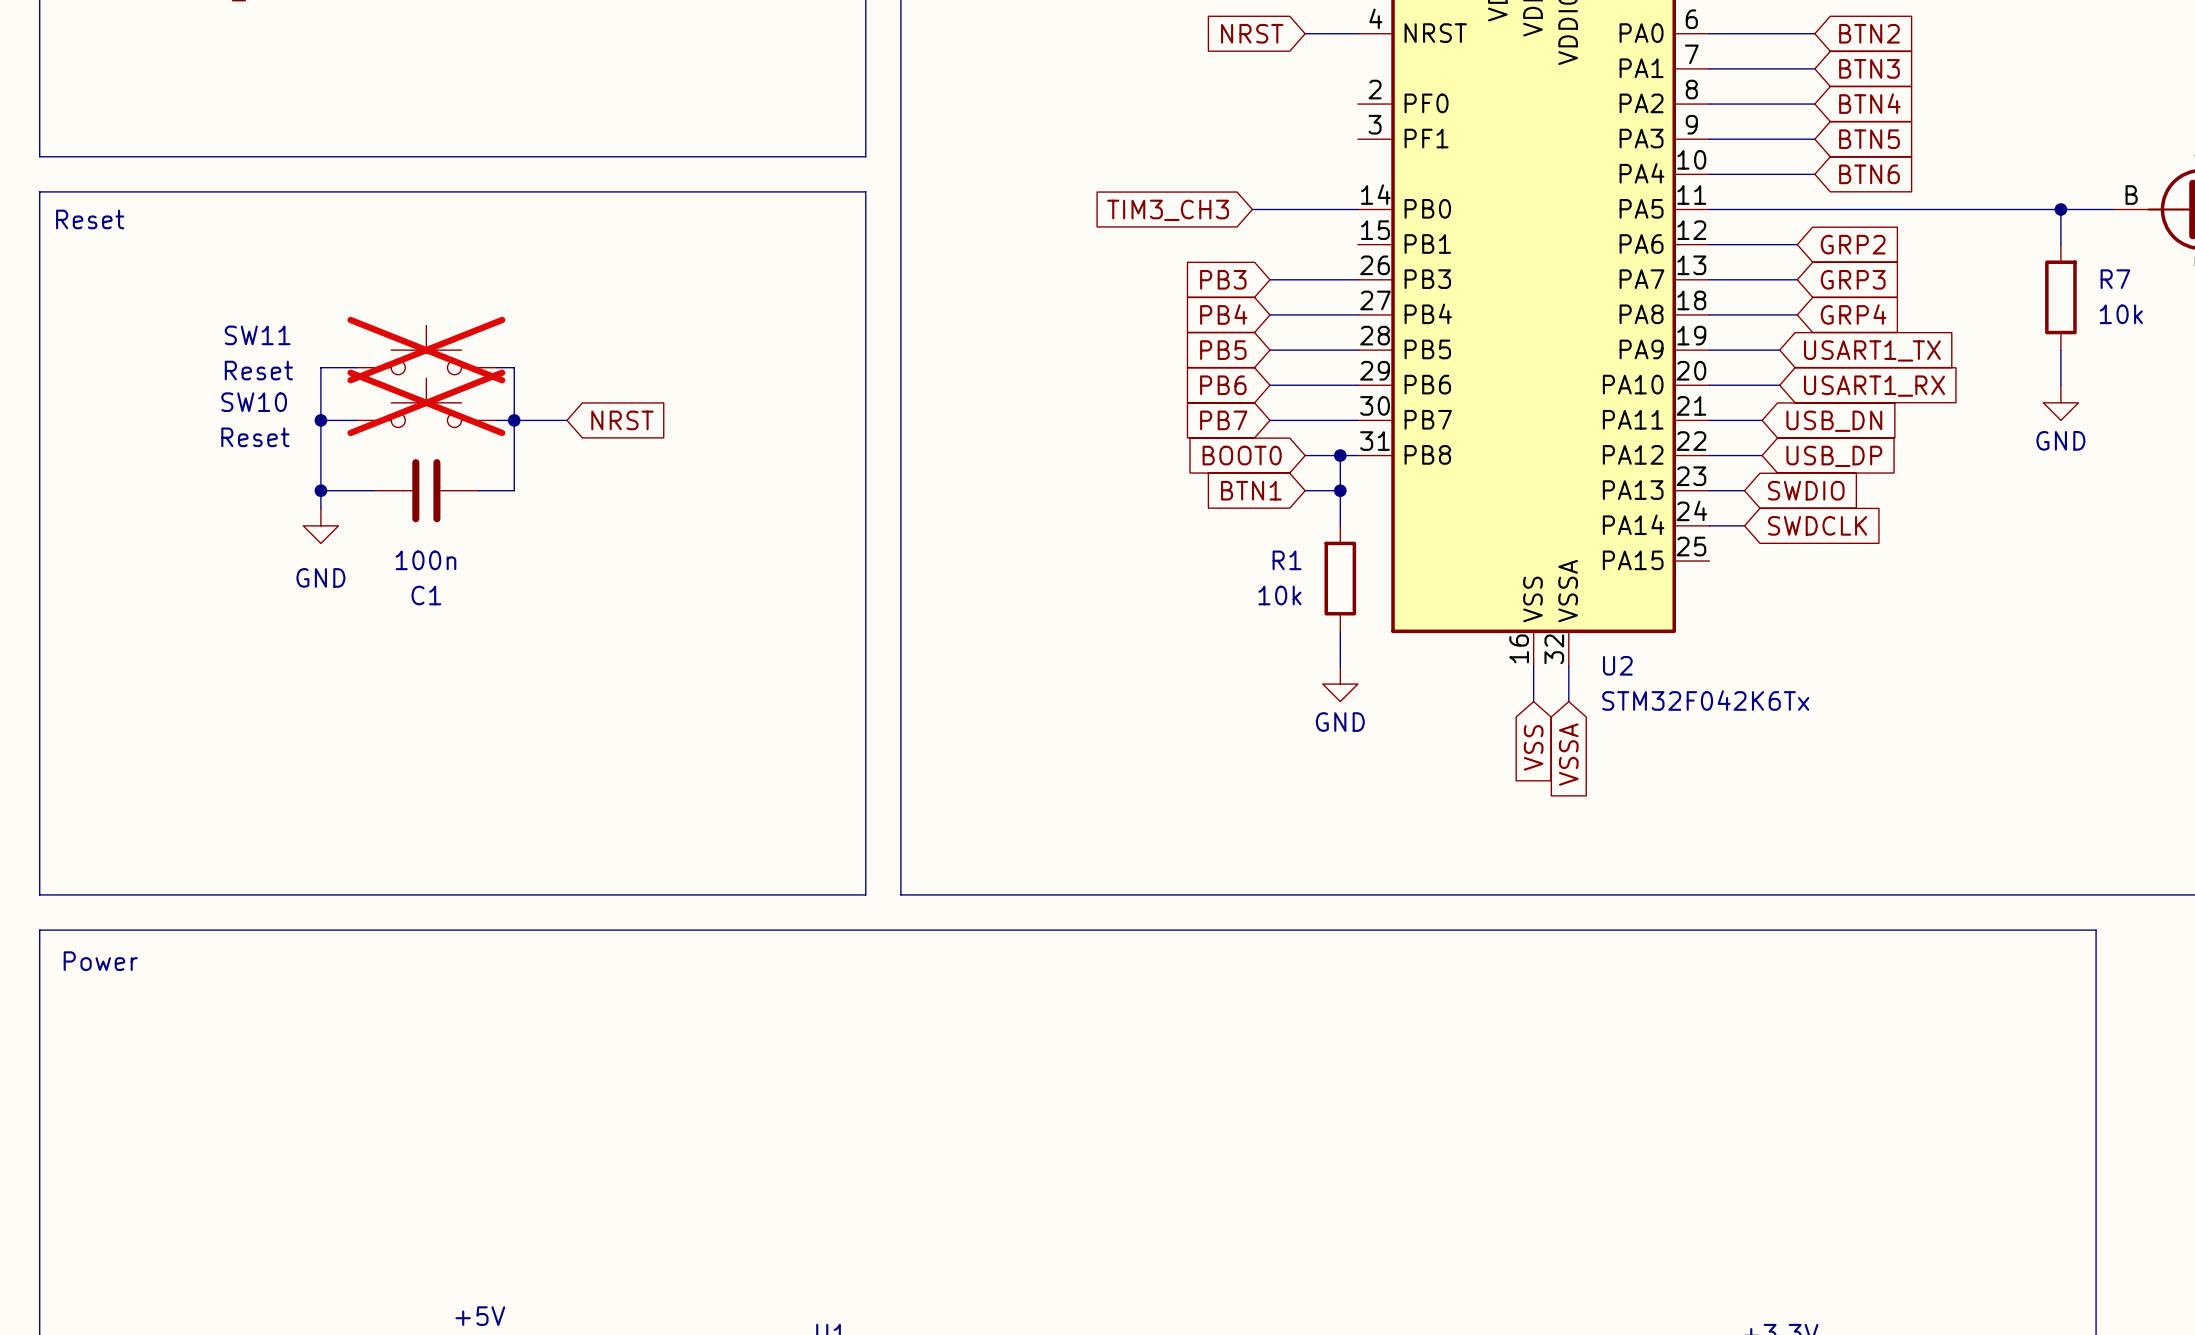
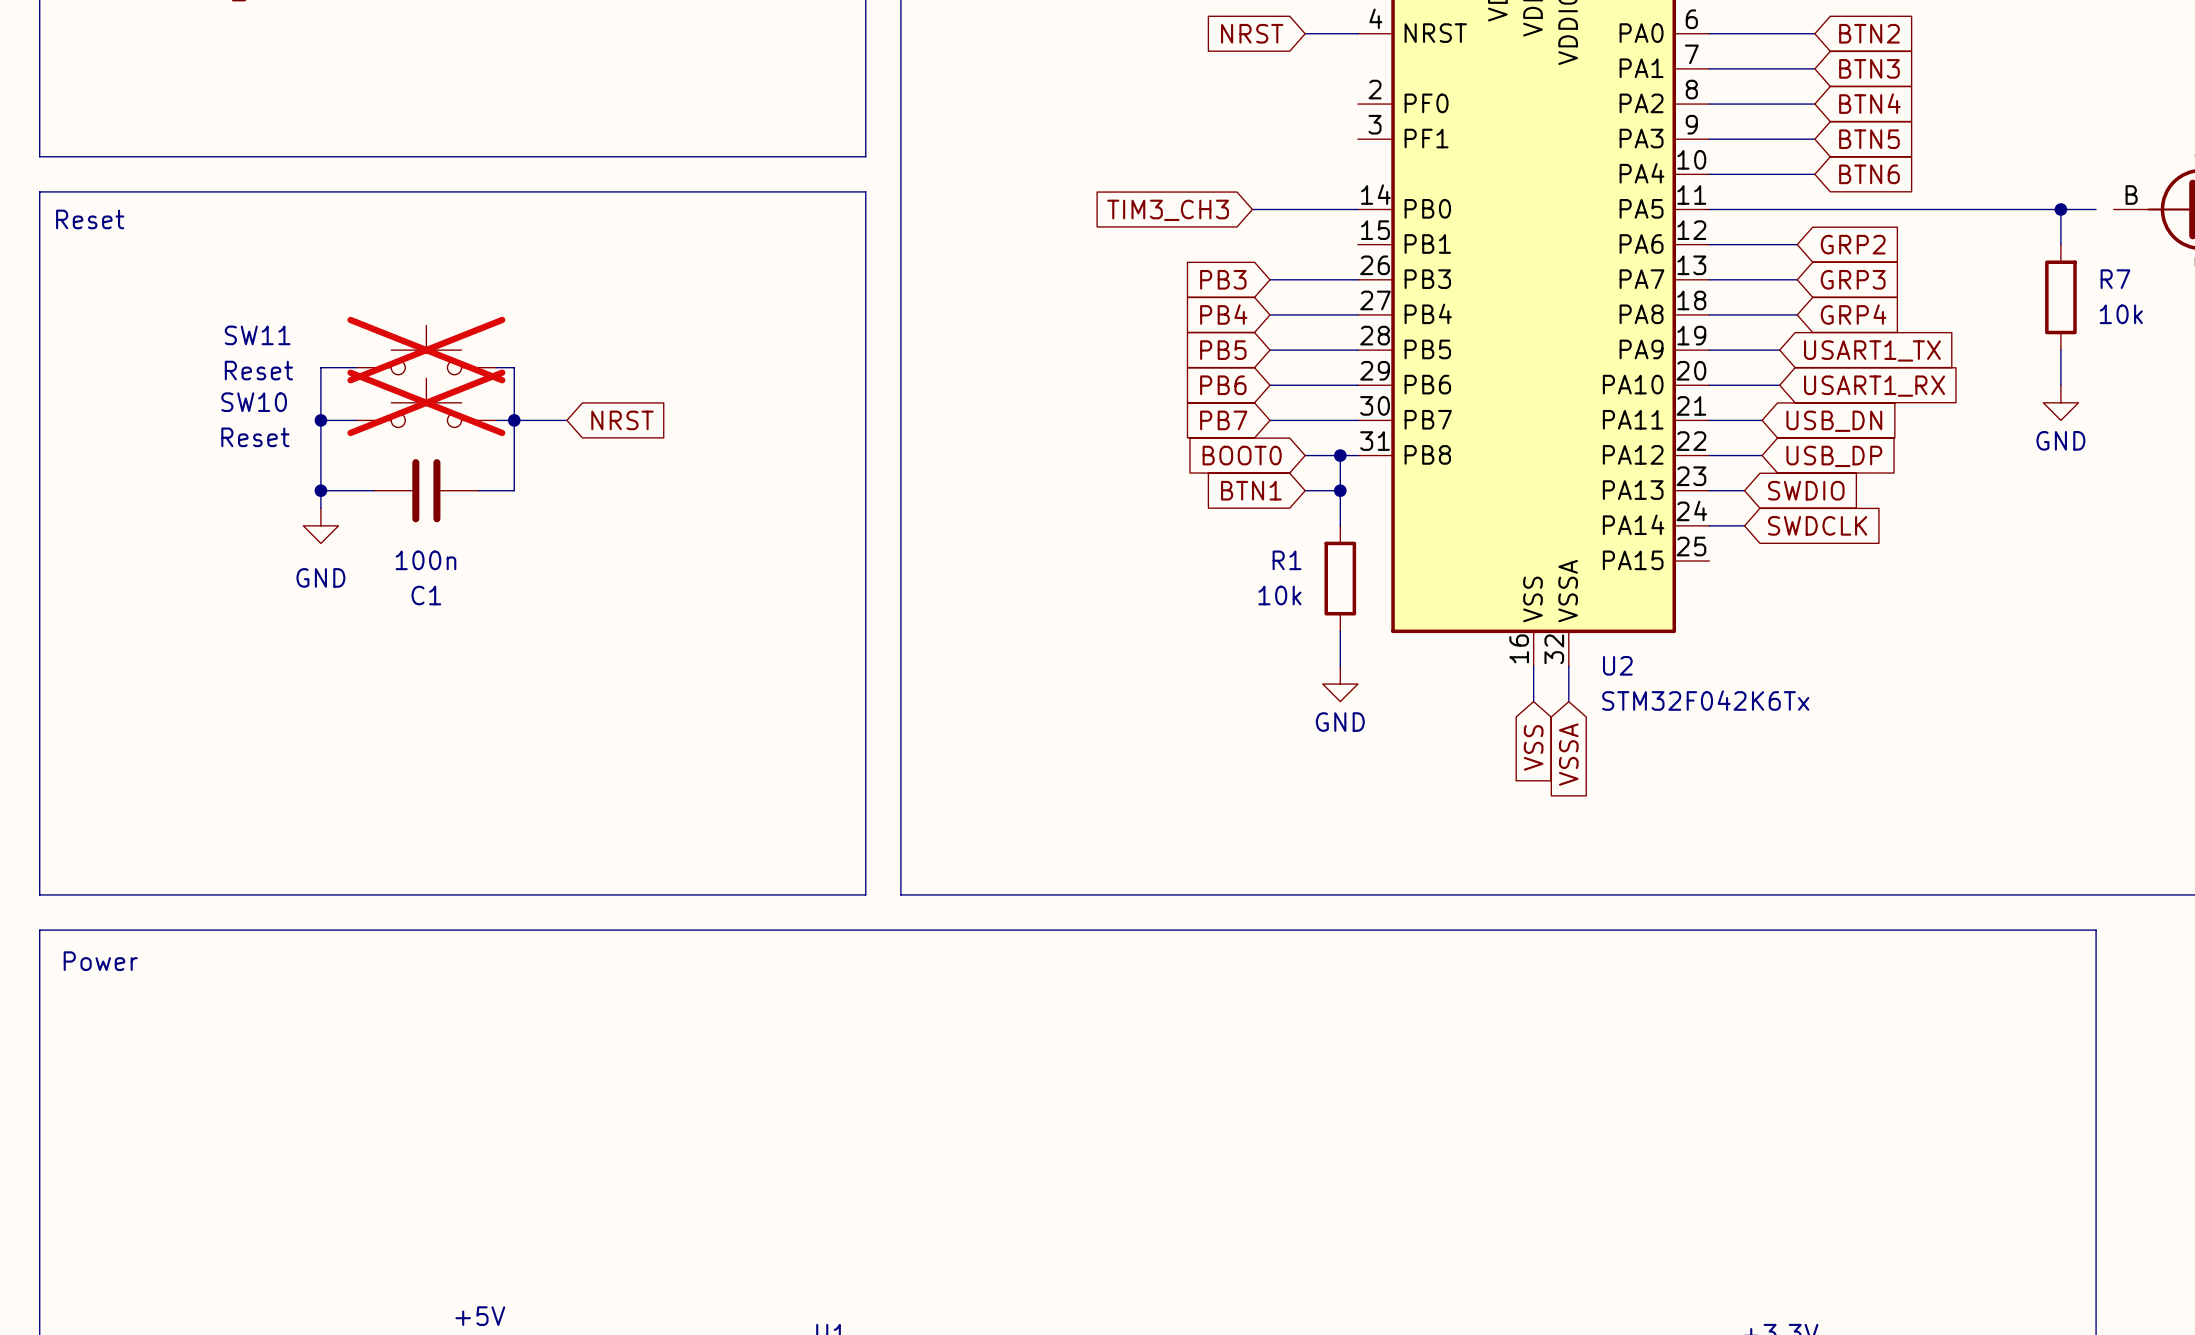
wire: (2096, 209) (2113, 209) -> none

